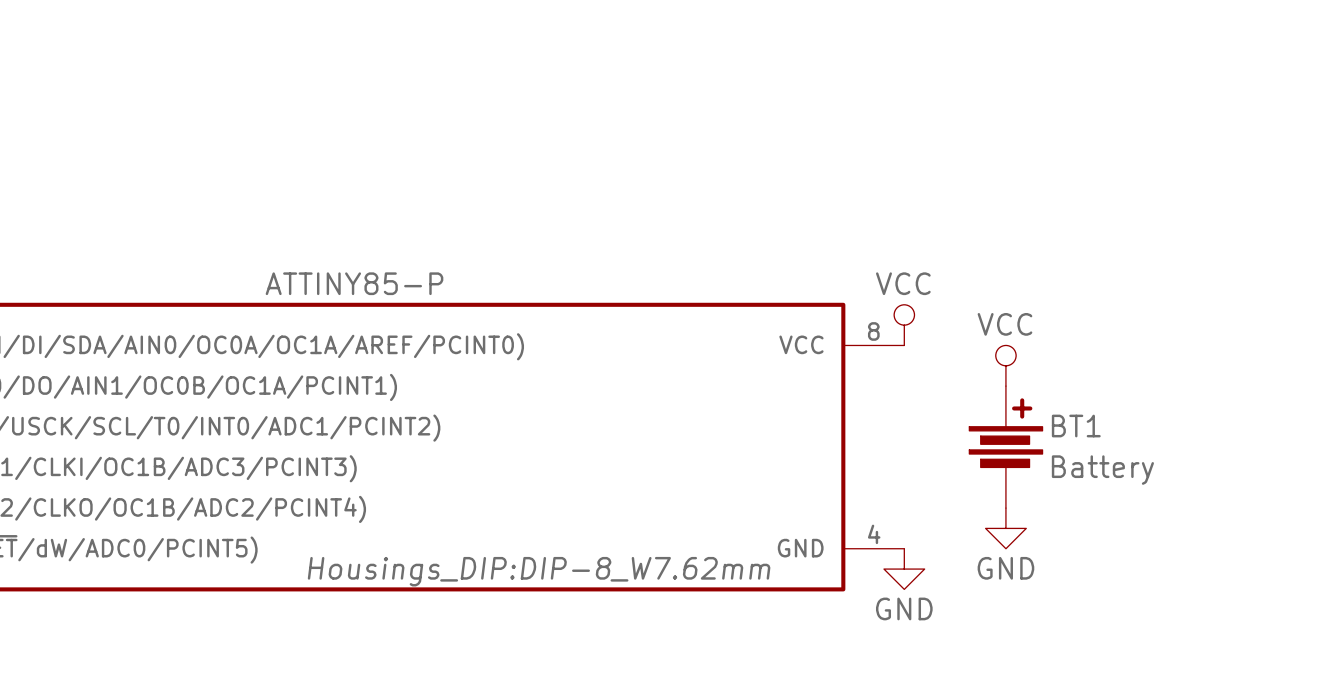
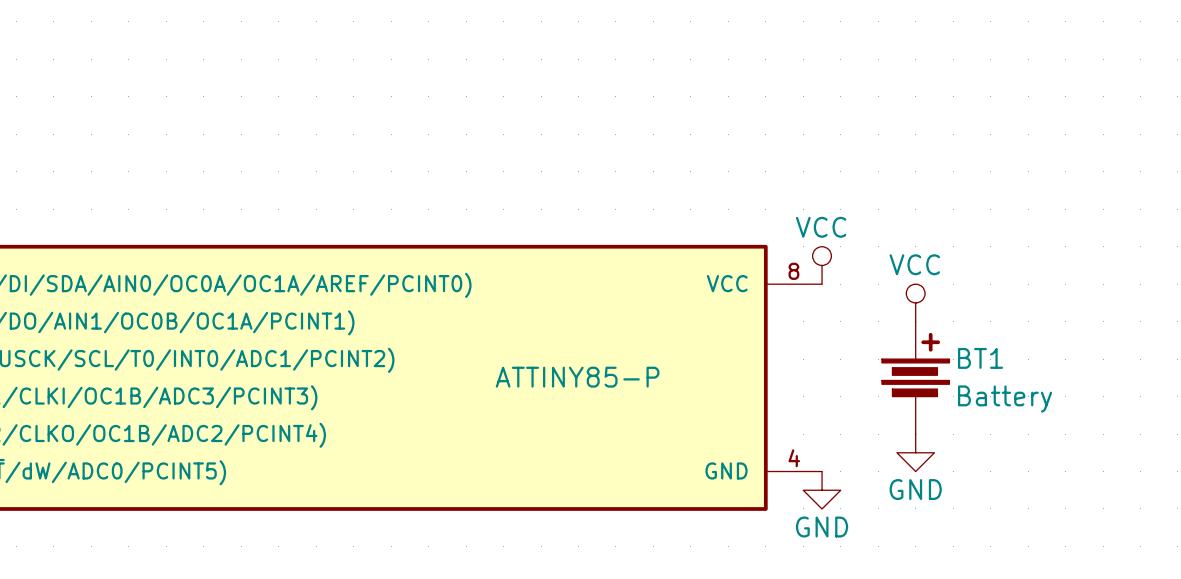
part value position: ATTINY85-P (354, 283) -> ATTINY85-P (577, 377)
part text: Housings_DIP:DIP-8_W7.62mm (539, 571) -> none

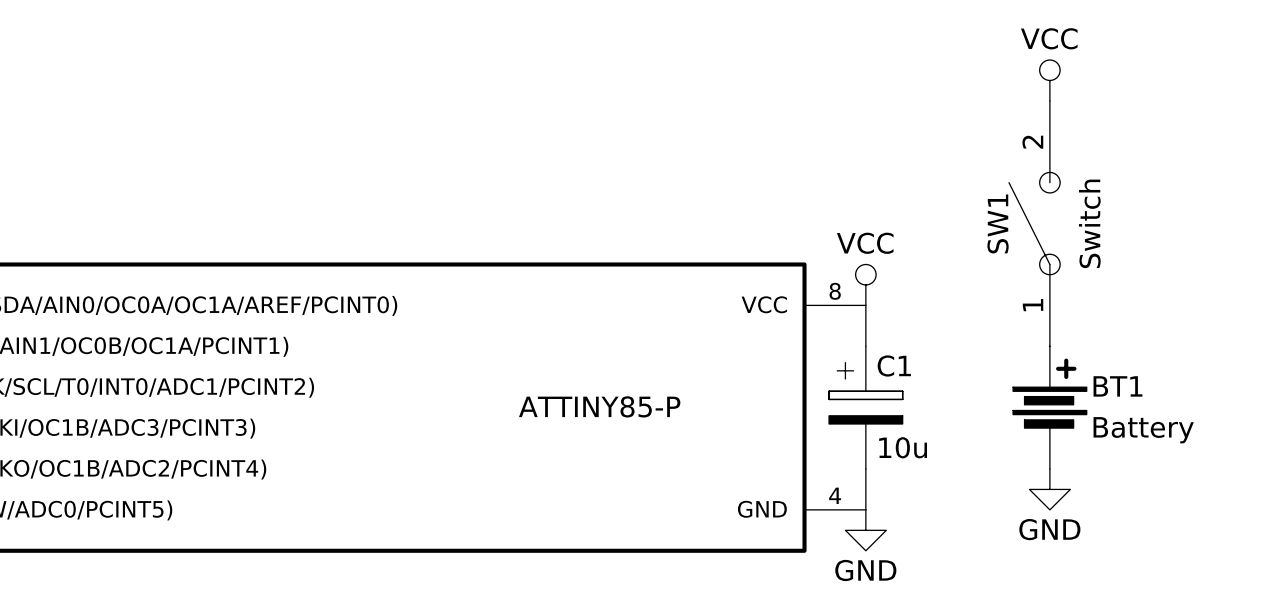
SW1: none -> Switch (1034, 223)
wire: none -> (865, 305) (865, 346)
power symbol position: VCC (915, 302) -> VCC (1049, 80)
C1: none -> 10u (865, 407)
BT1 position: (915, 377) -> (1049, 407)
wire: none -> (865, 468) (865, 509)
power symbol position: GND (915, 452) -> GND (1049, 489)

